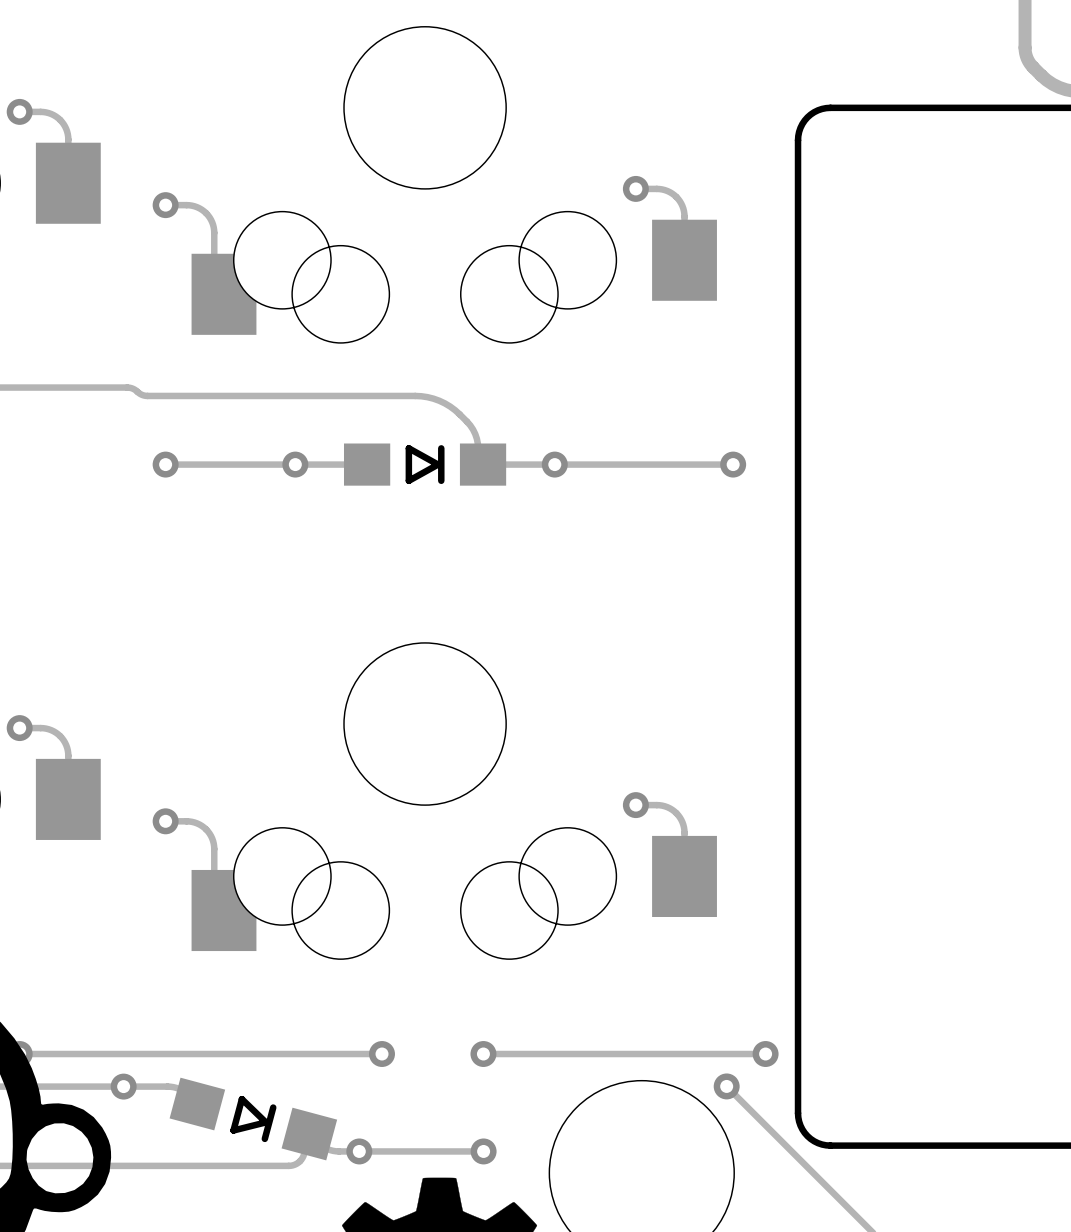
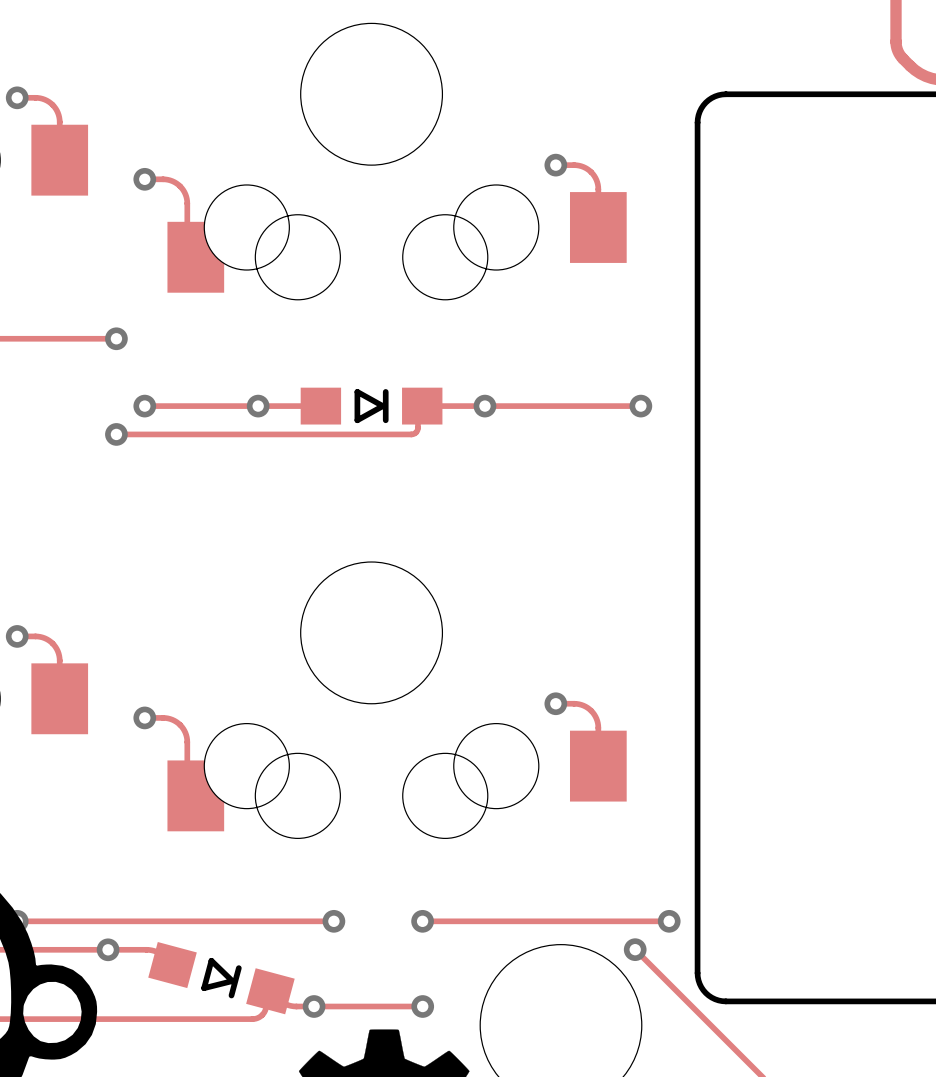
track: (127, 387) (147, 395) (427, 397) (450, 406) (470, 425) (476, 438) (478, 464) -> (116, 434) (412, 434) (417, 429) (417, 406)
via: none -> (116, 338)
via: none -> (116, 434)

